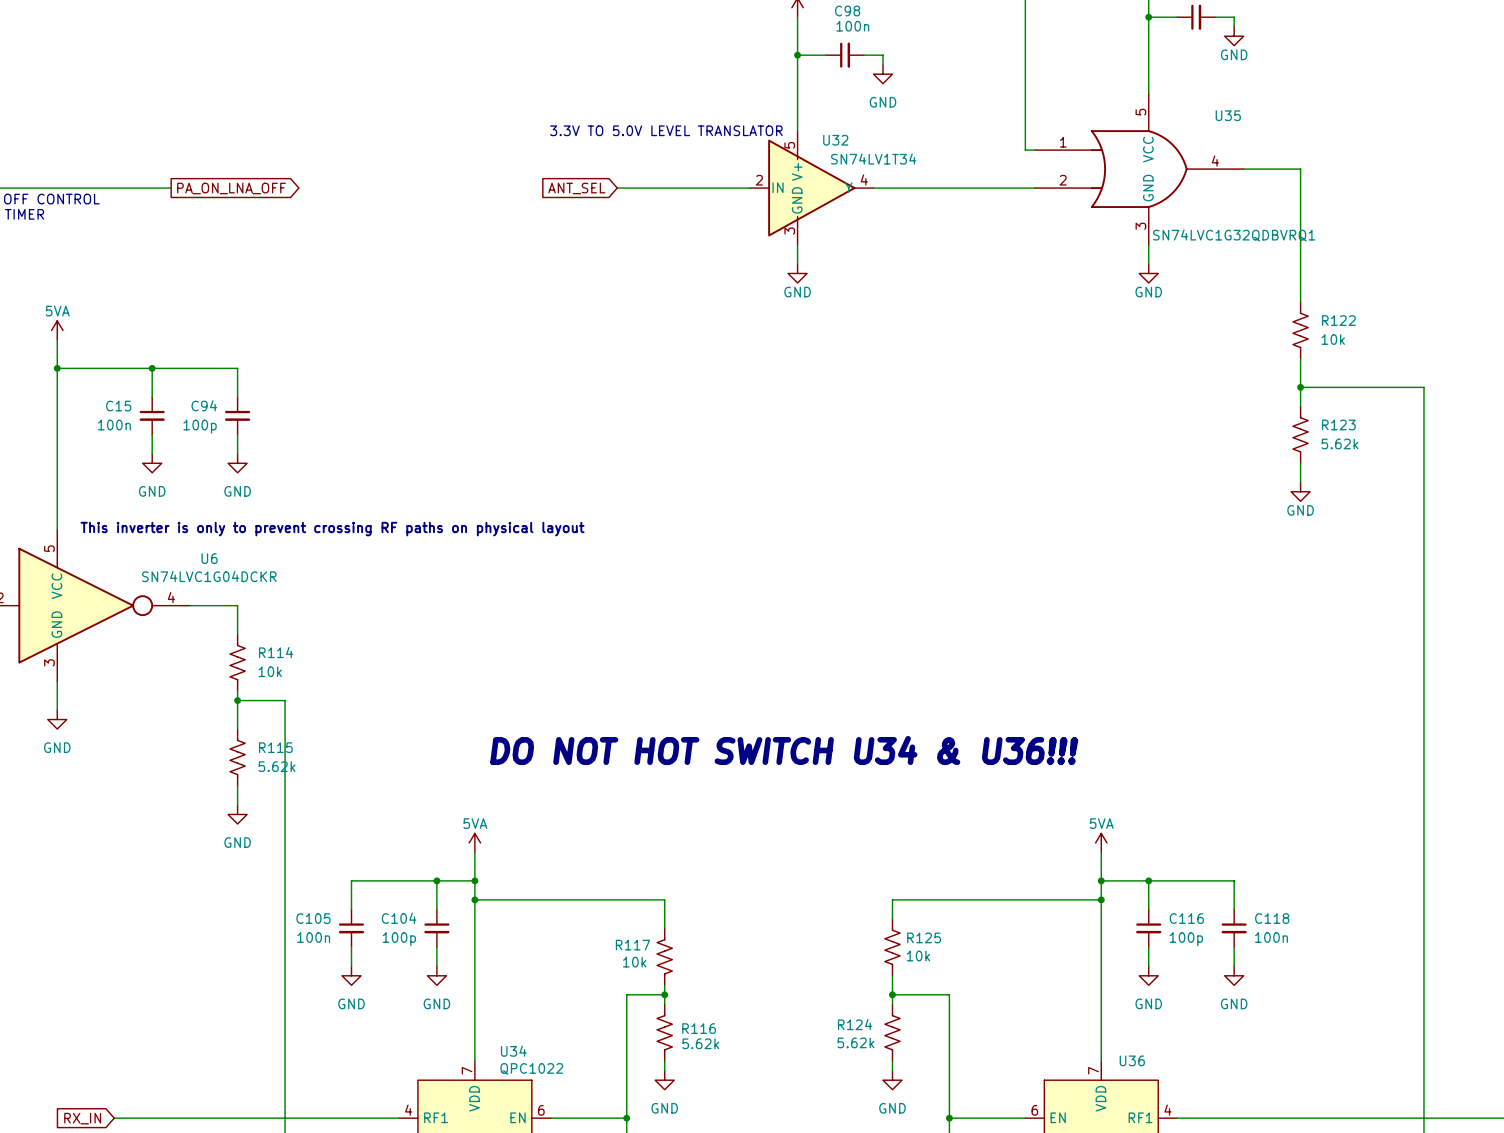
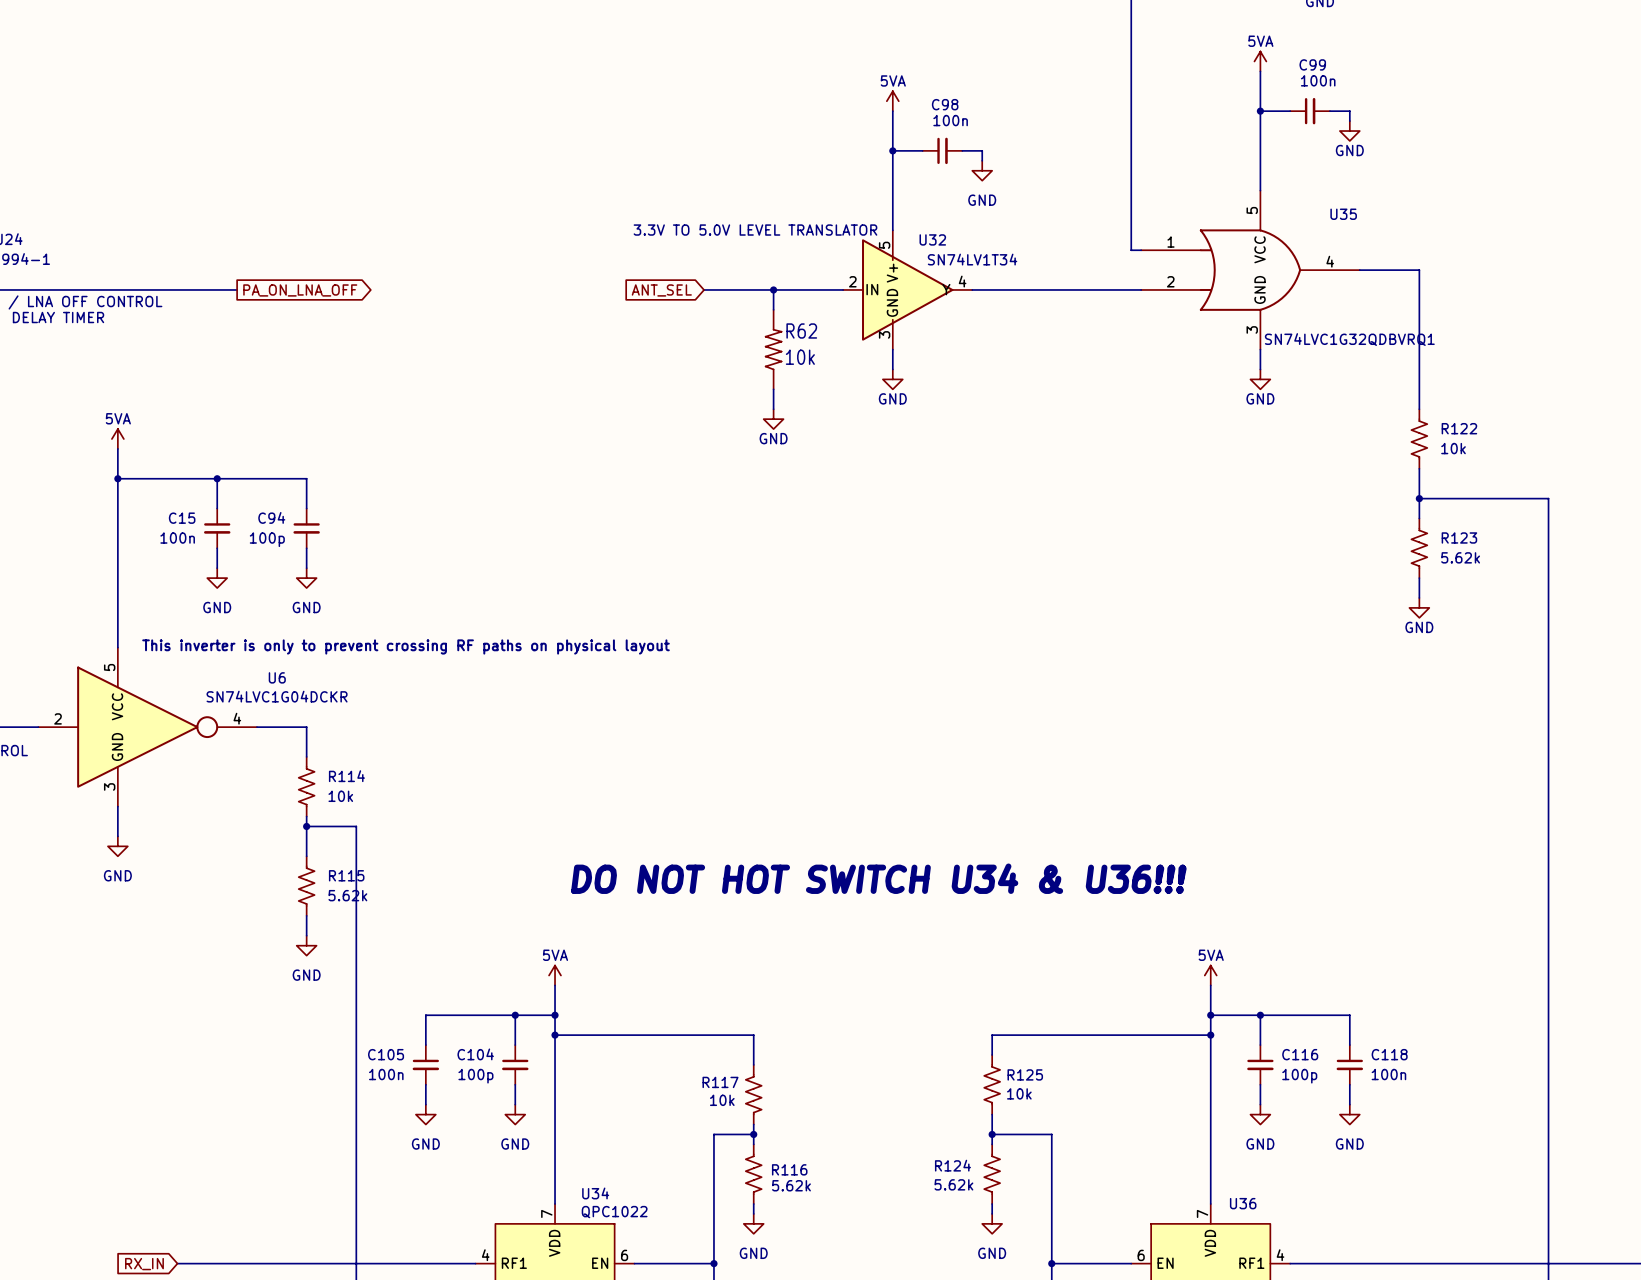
wire: none -> (773, 289) (773, 309)
junction: none -> (773, 289)
R62: none -> 10k (773, 349)
wire: none -> (773, 389) (773, 409)
power symbol: none -> GND (773, 419)

